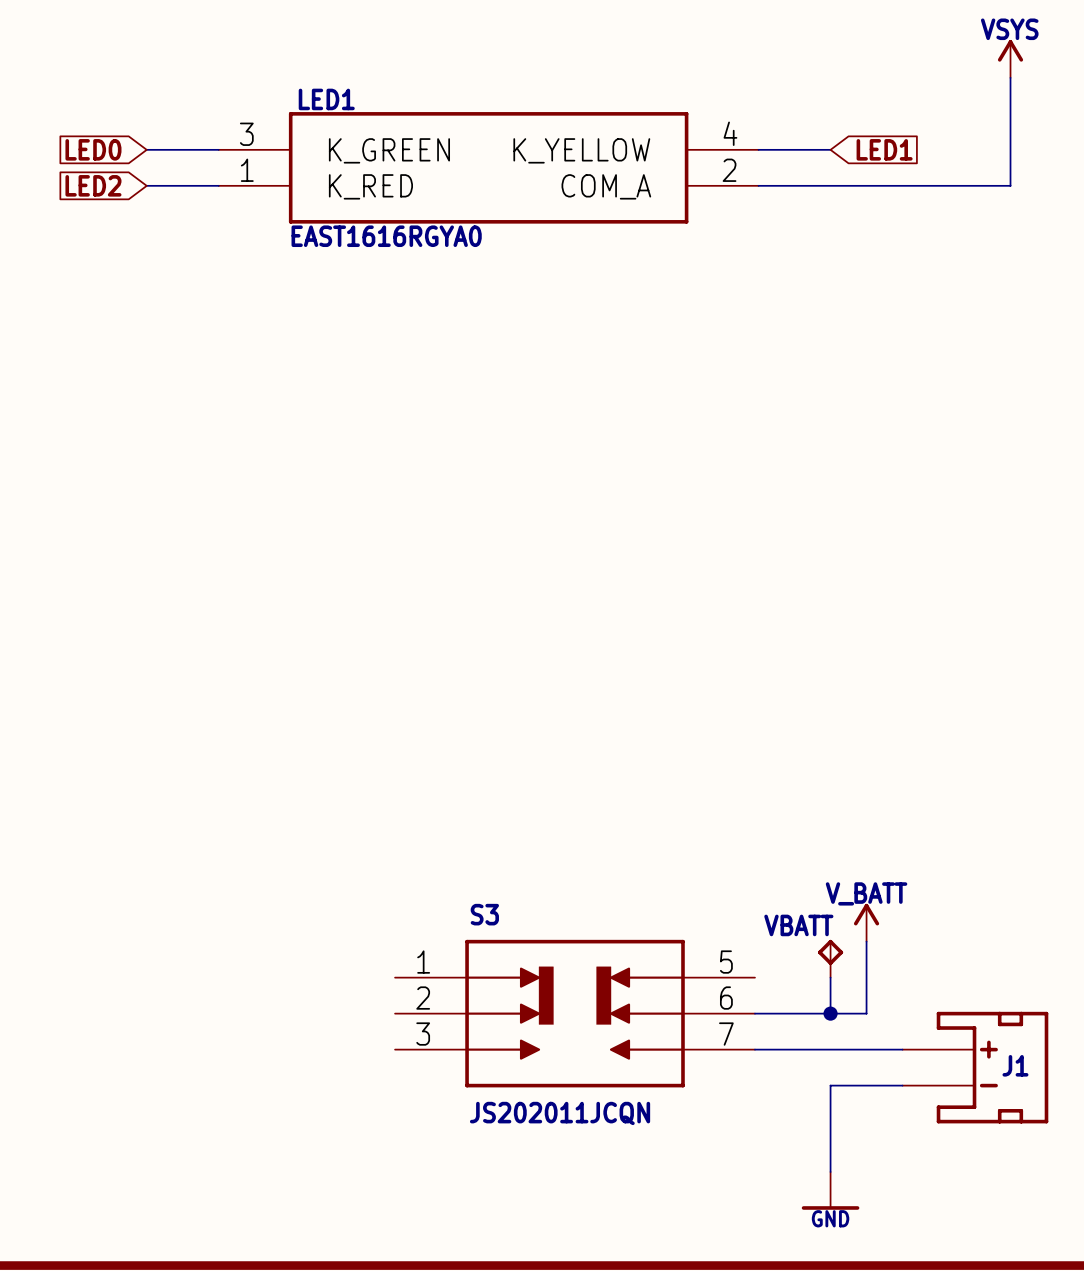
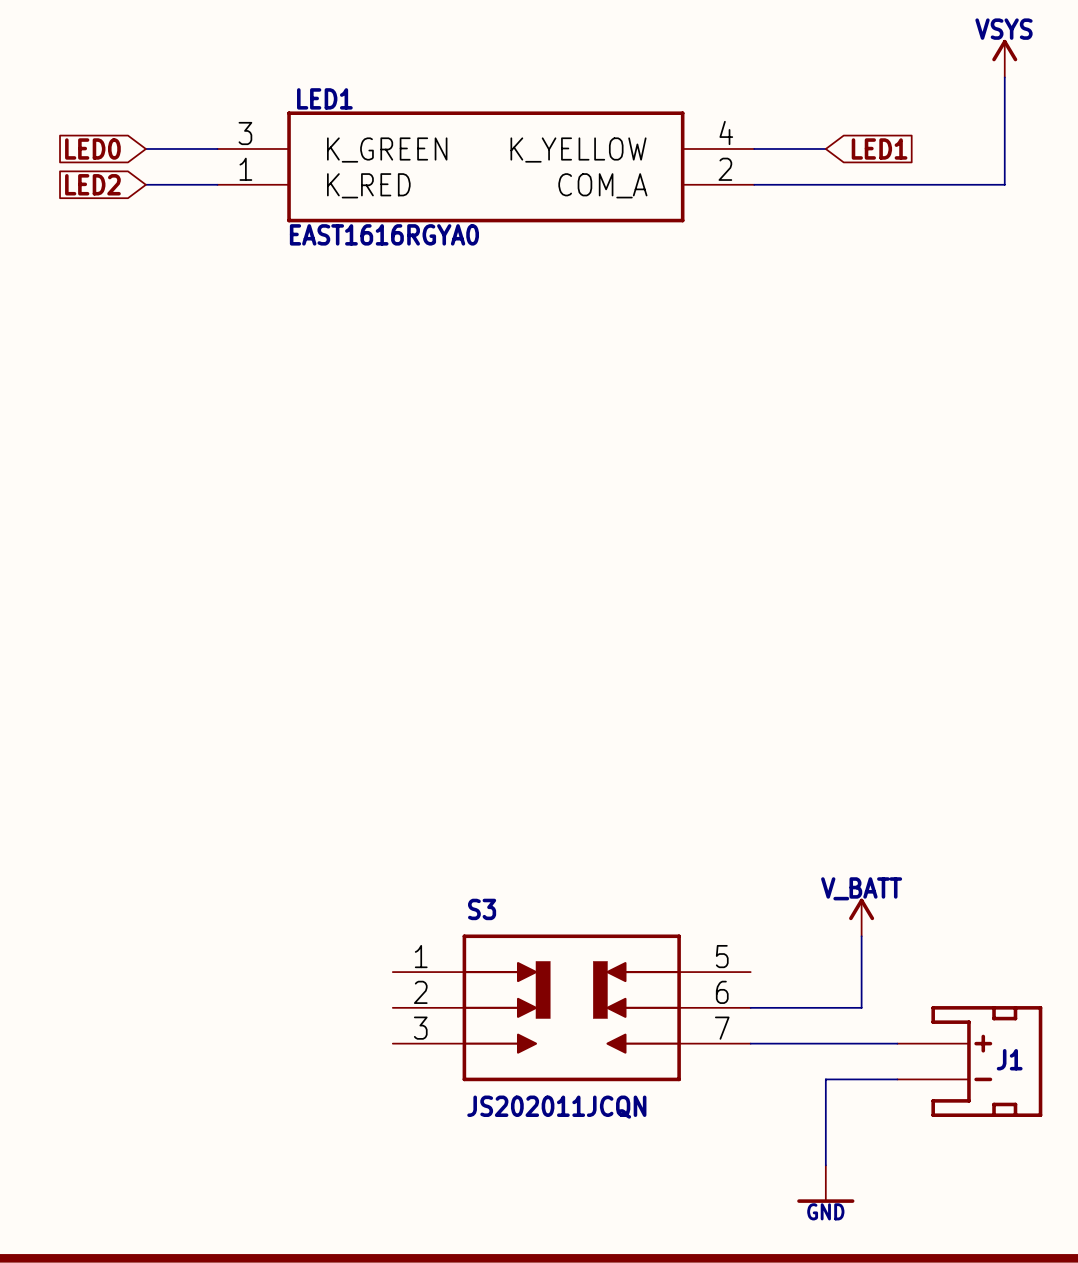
VBATT: (830, 958) -> none
wire: (830, 977) (830, 1013) -> none
junction: (830, 1013) -> none

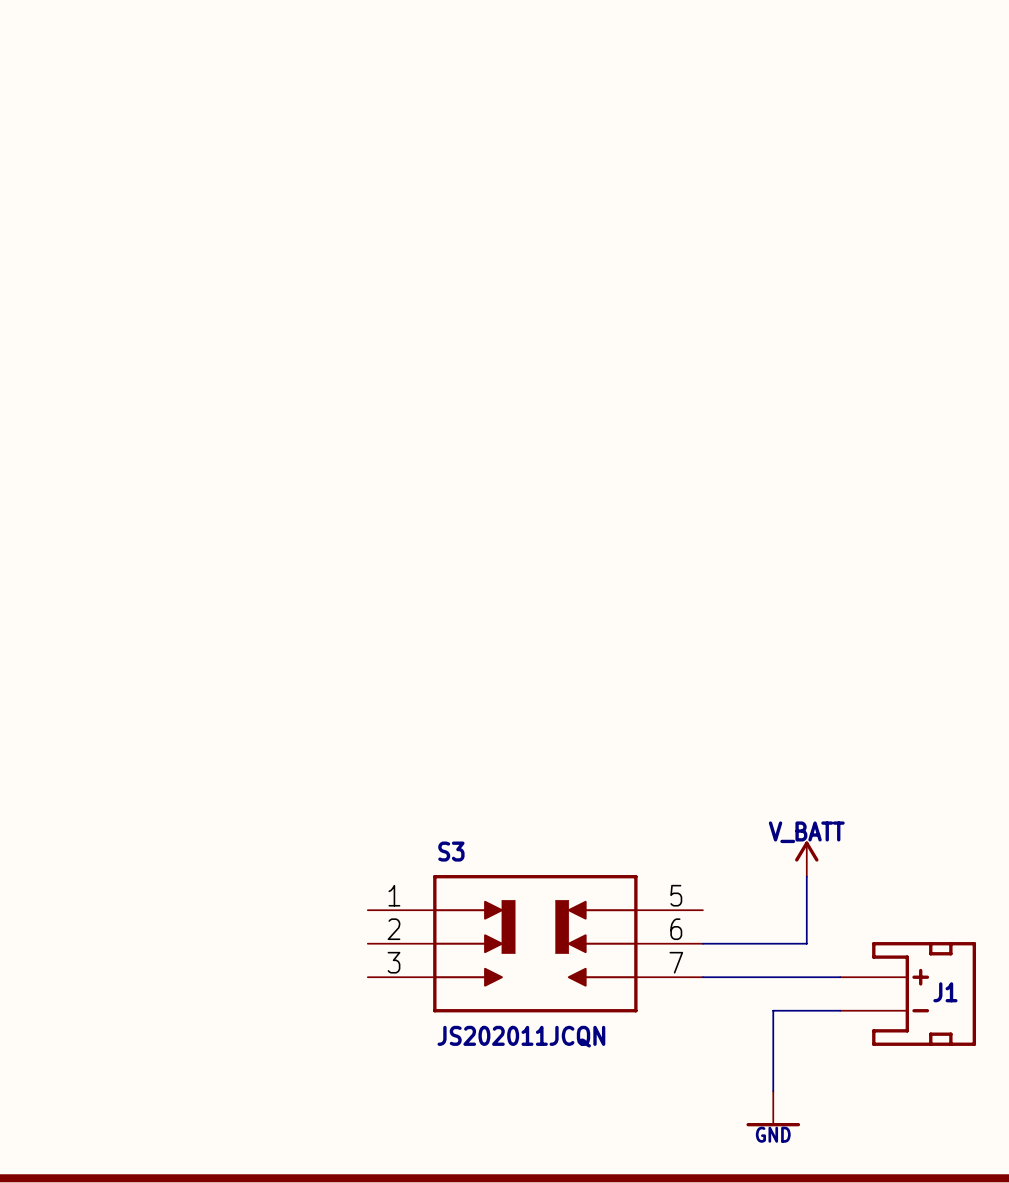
power symbol: VSYS (1004, 58) -> none
wire: (1004, 77) (1004, 184) (754, 184) -> none
global label: LED0 (92, 148) -> none
wire: (145, 148) (217, 148) -> none
wire: (754, 148) (825, 148) -> none
global label: LED1 (879, 148) -> none
LED1: EAST1616RGYA0 (485, 166) -> none
global label: LED2 (92, 184) -> none
wire: (145, 184) (217, 184) -> none

